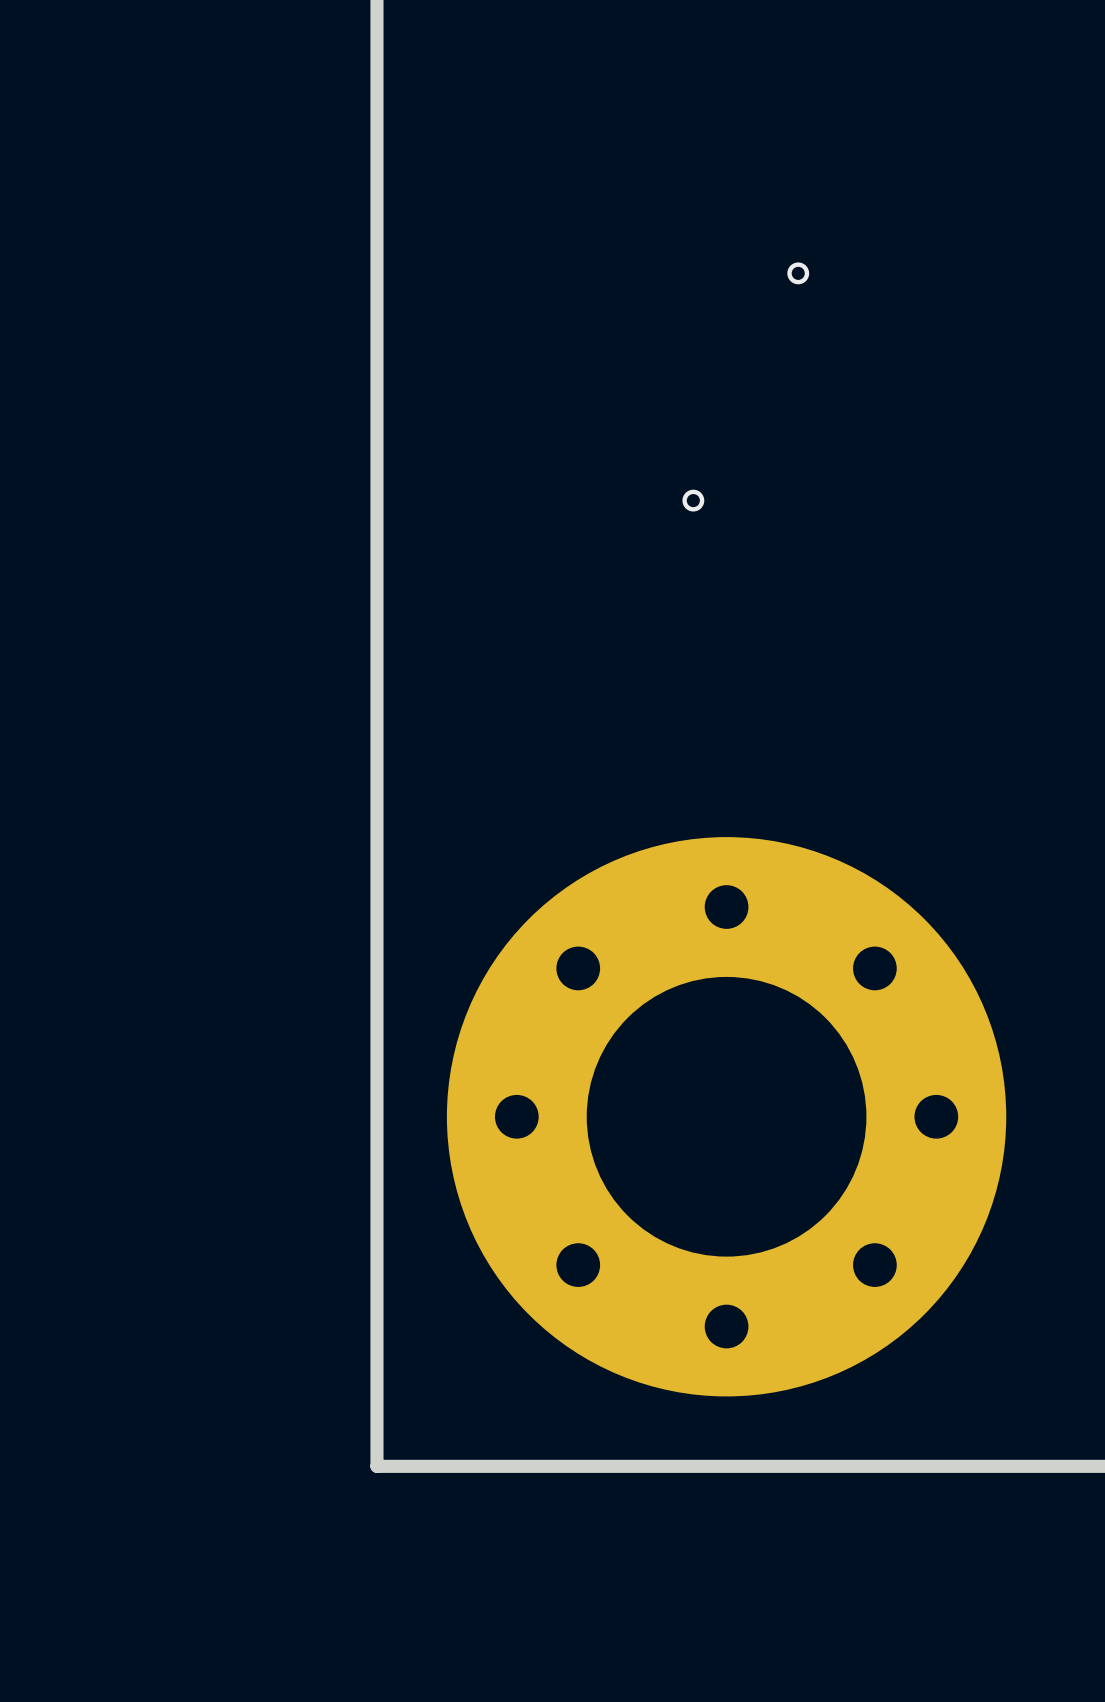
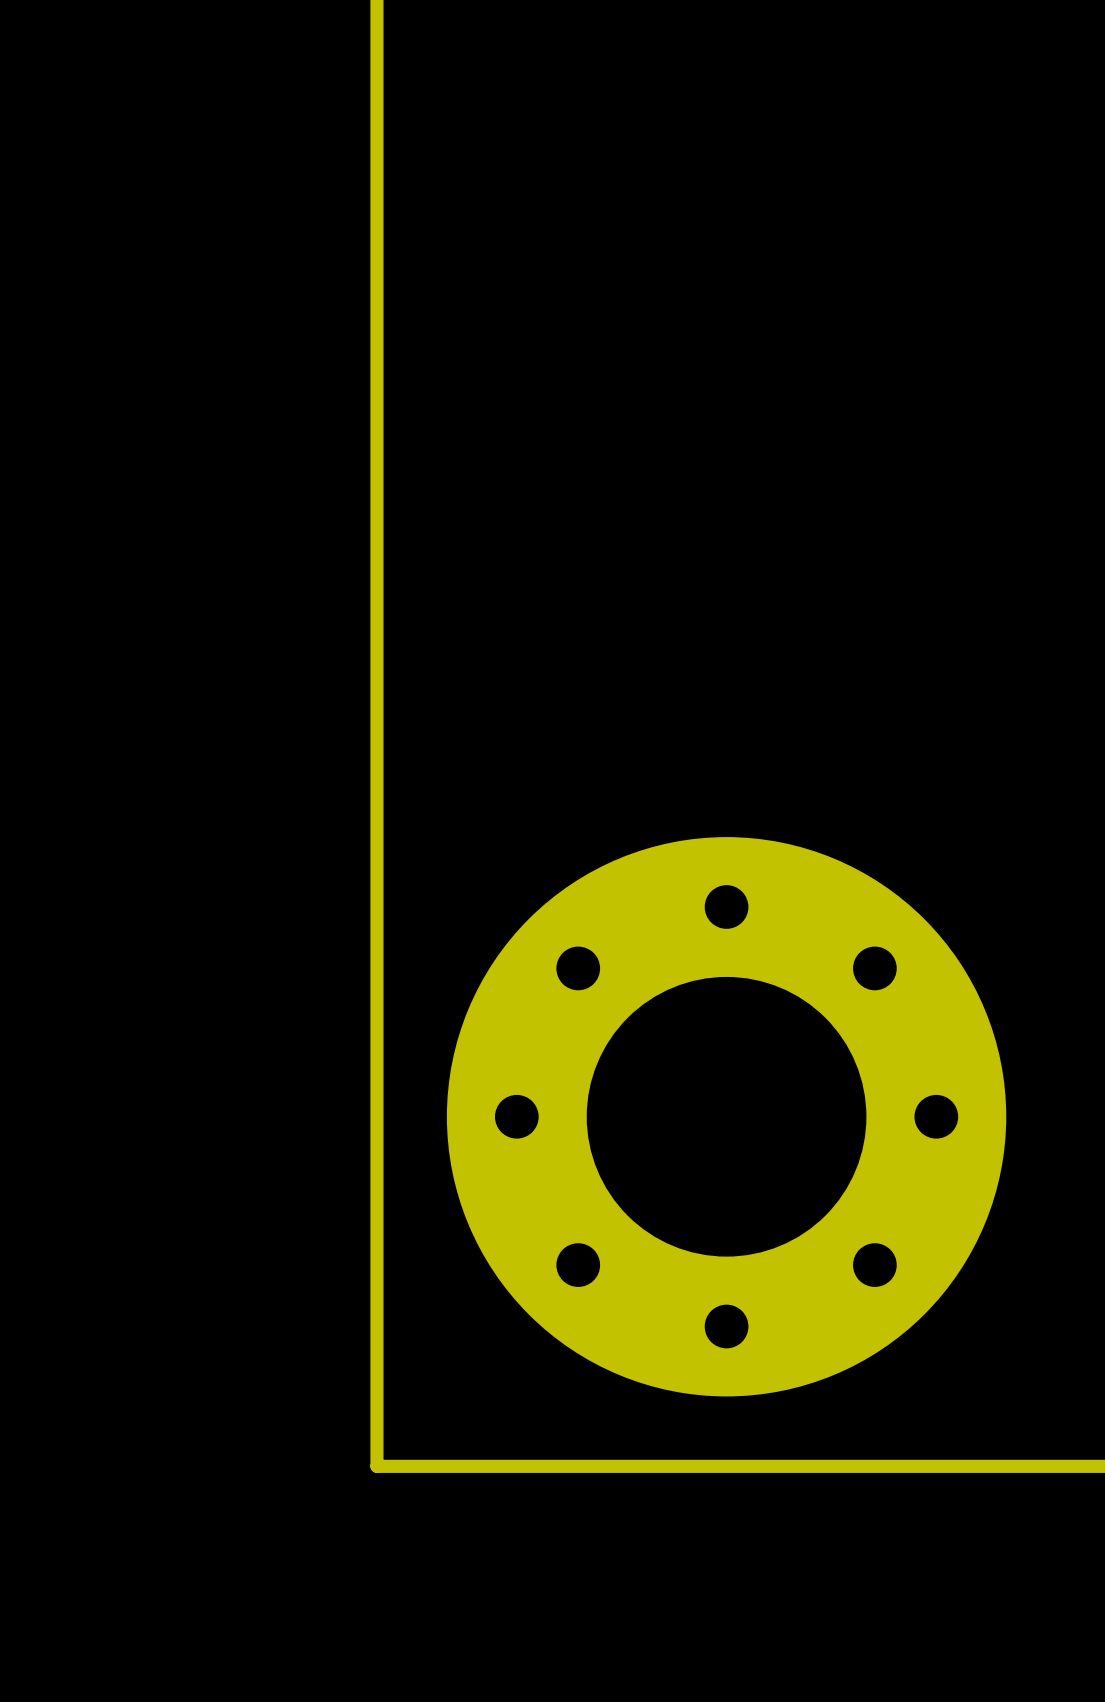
via: (798, 273) -> none
via: (693, 500) -> none

